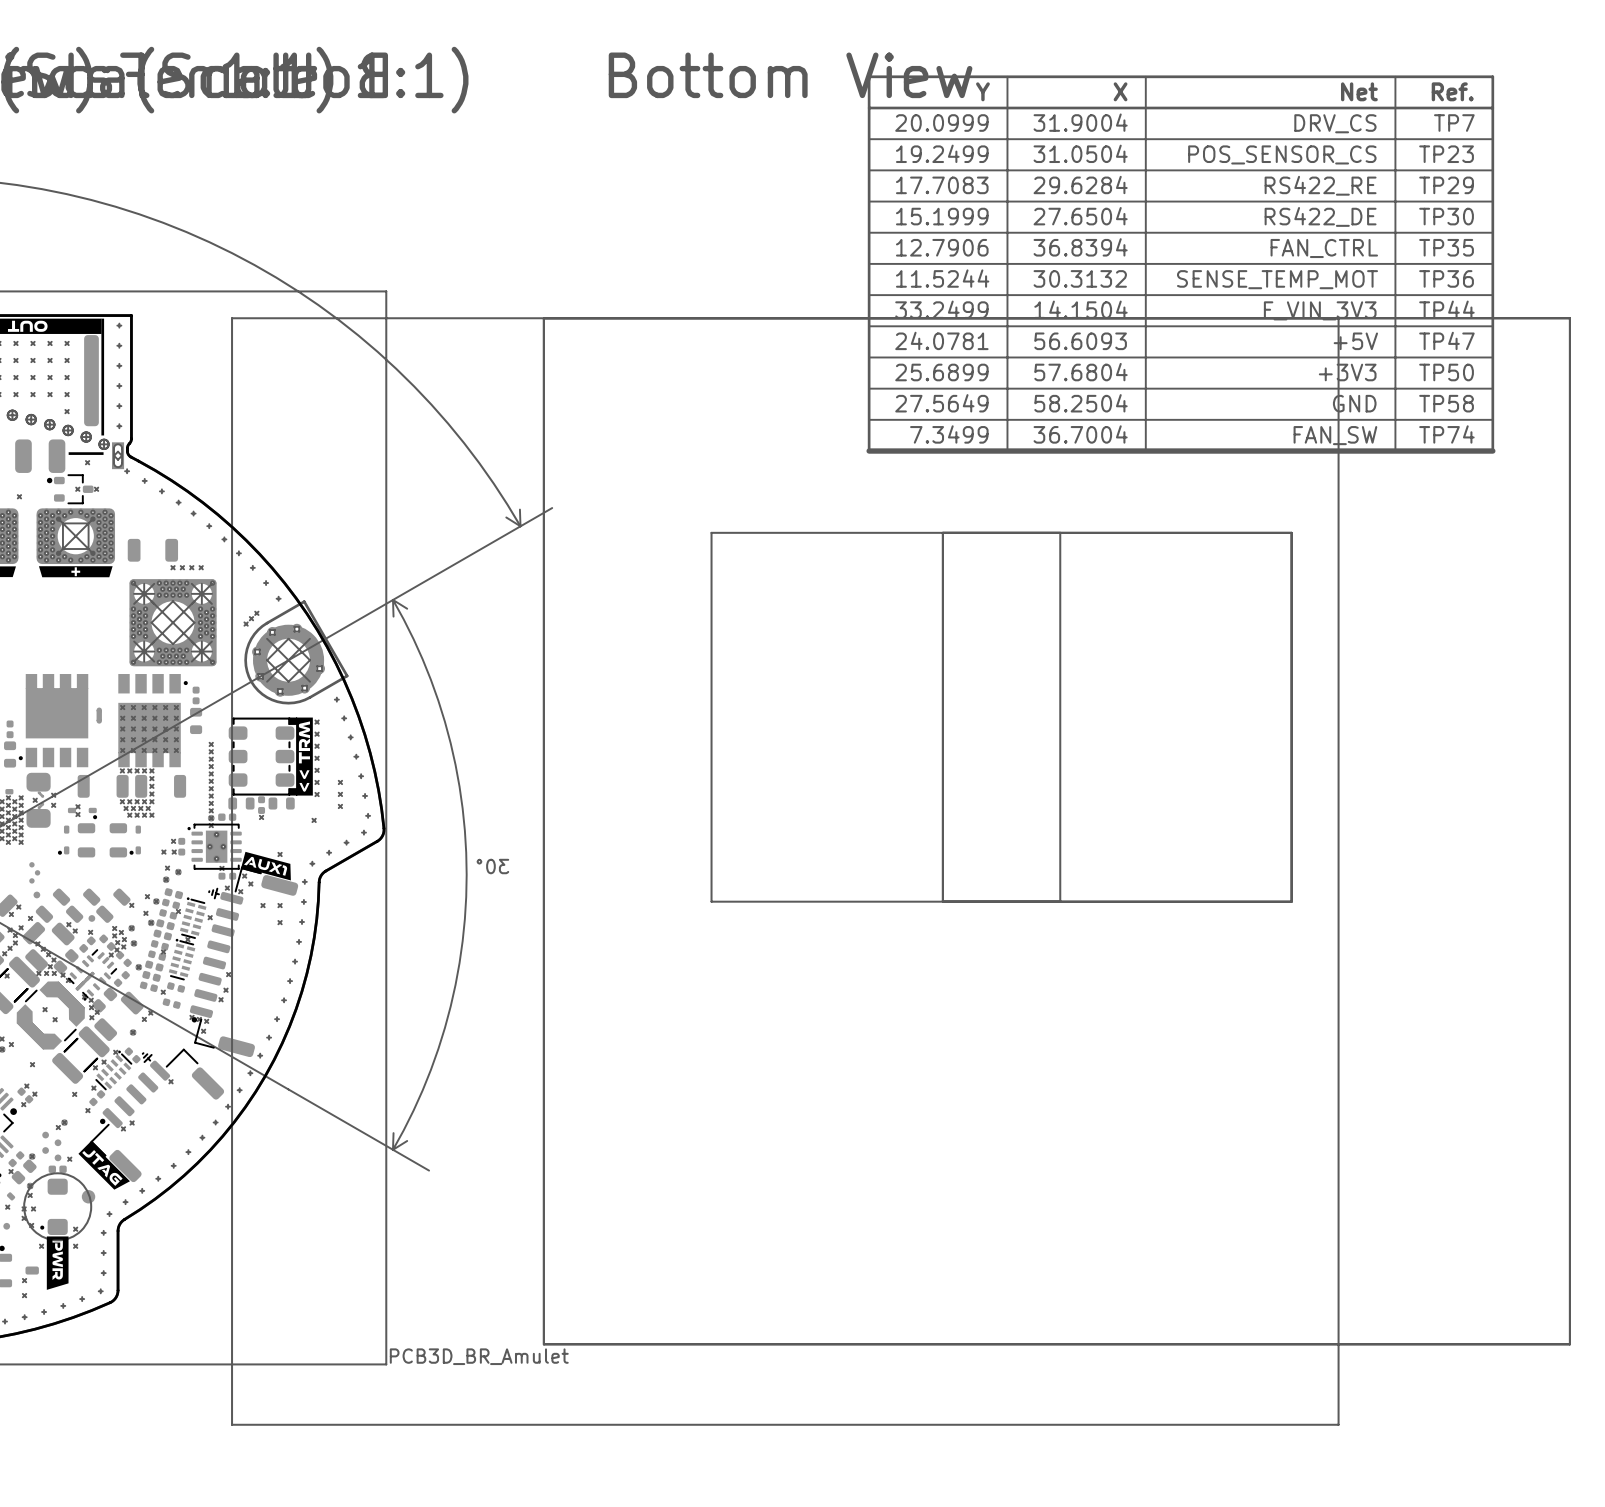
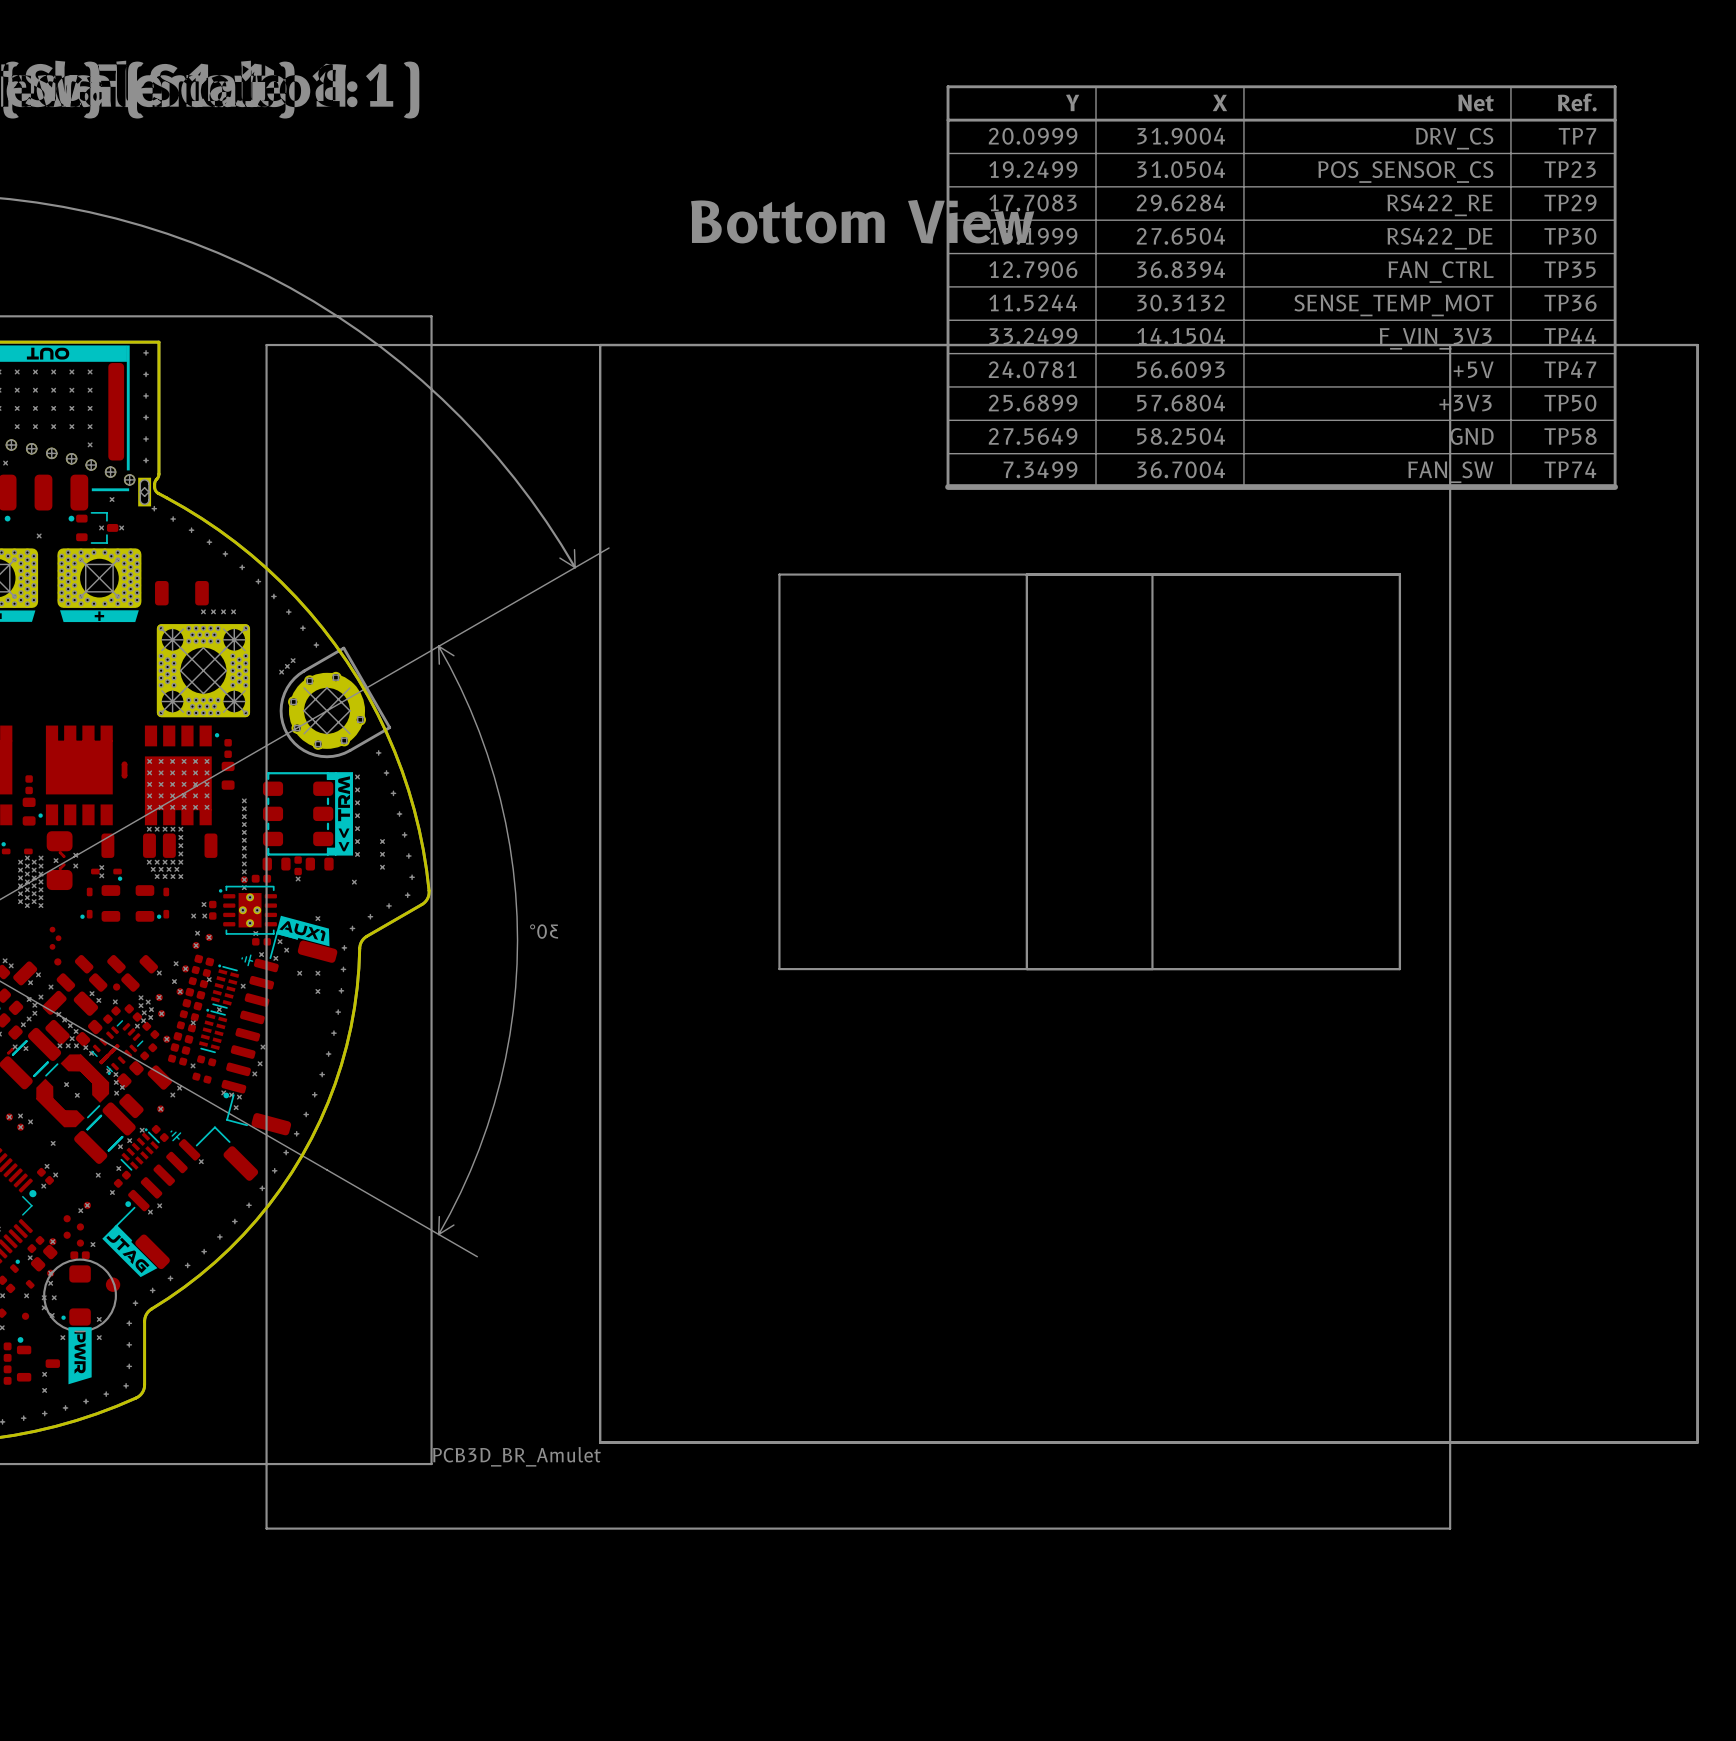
text position: Bottom View (790, 75) -> Bottom View (862, 221)

